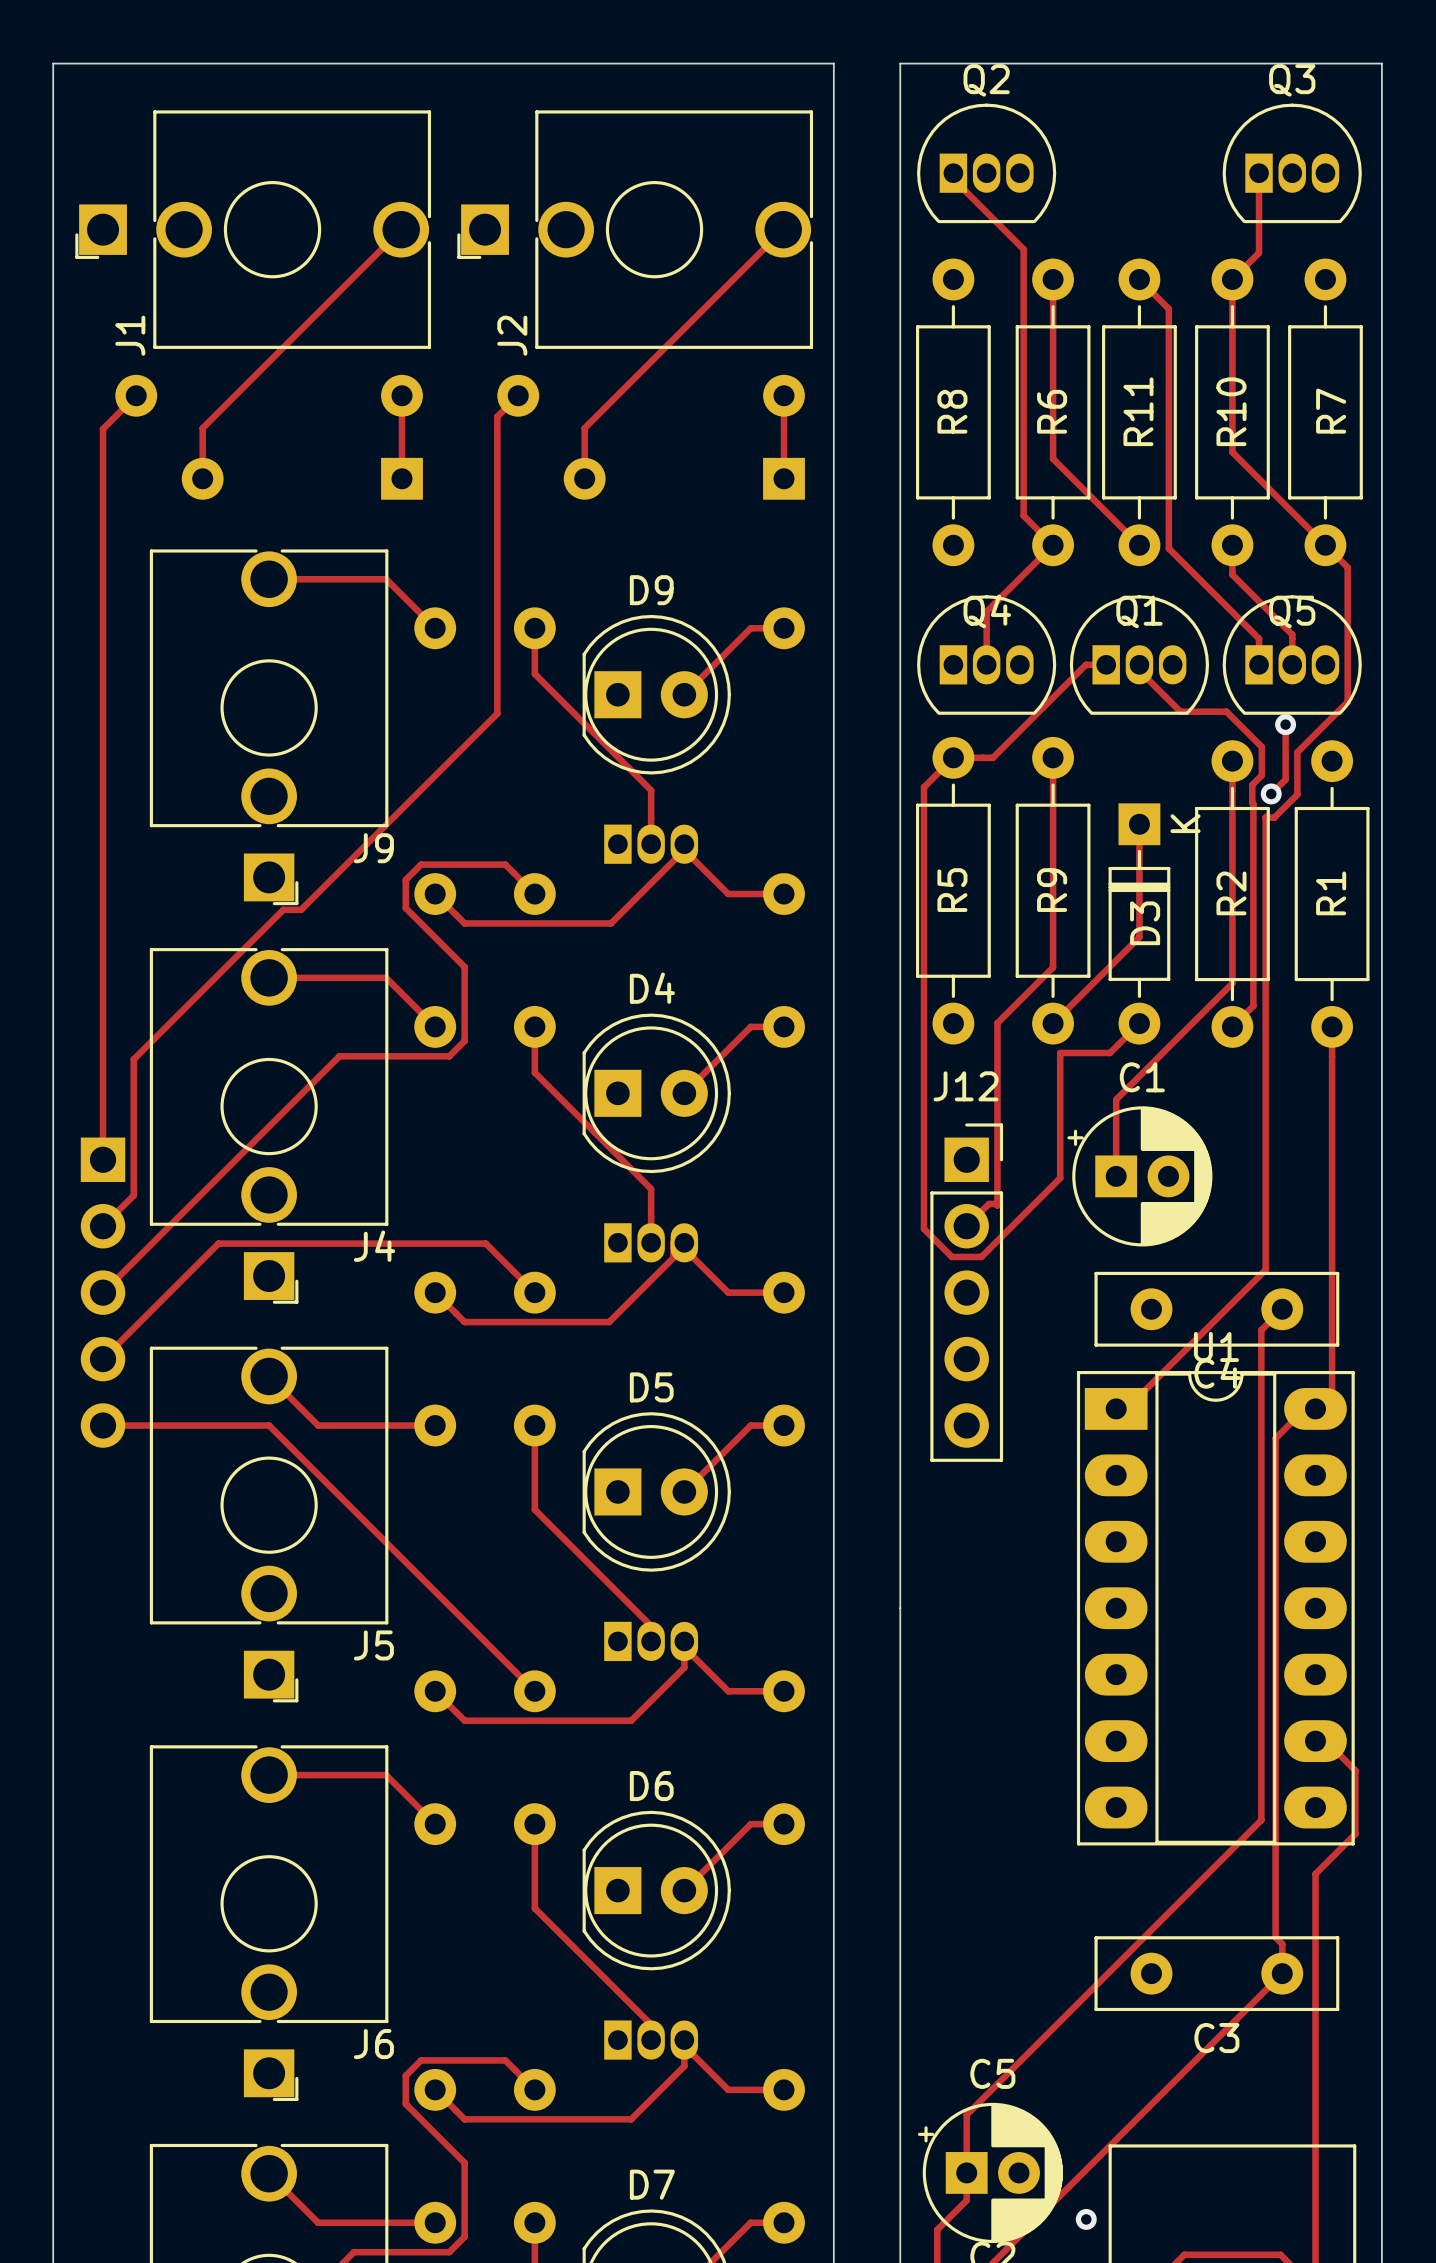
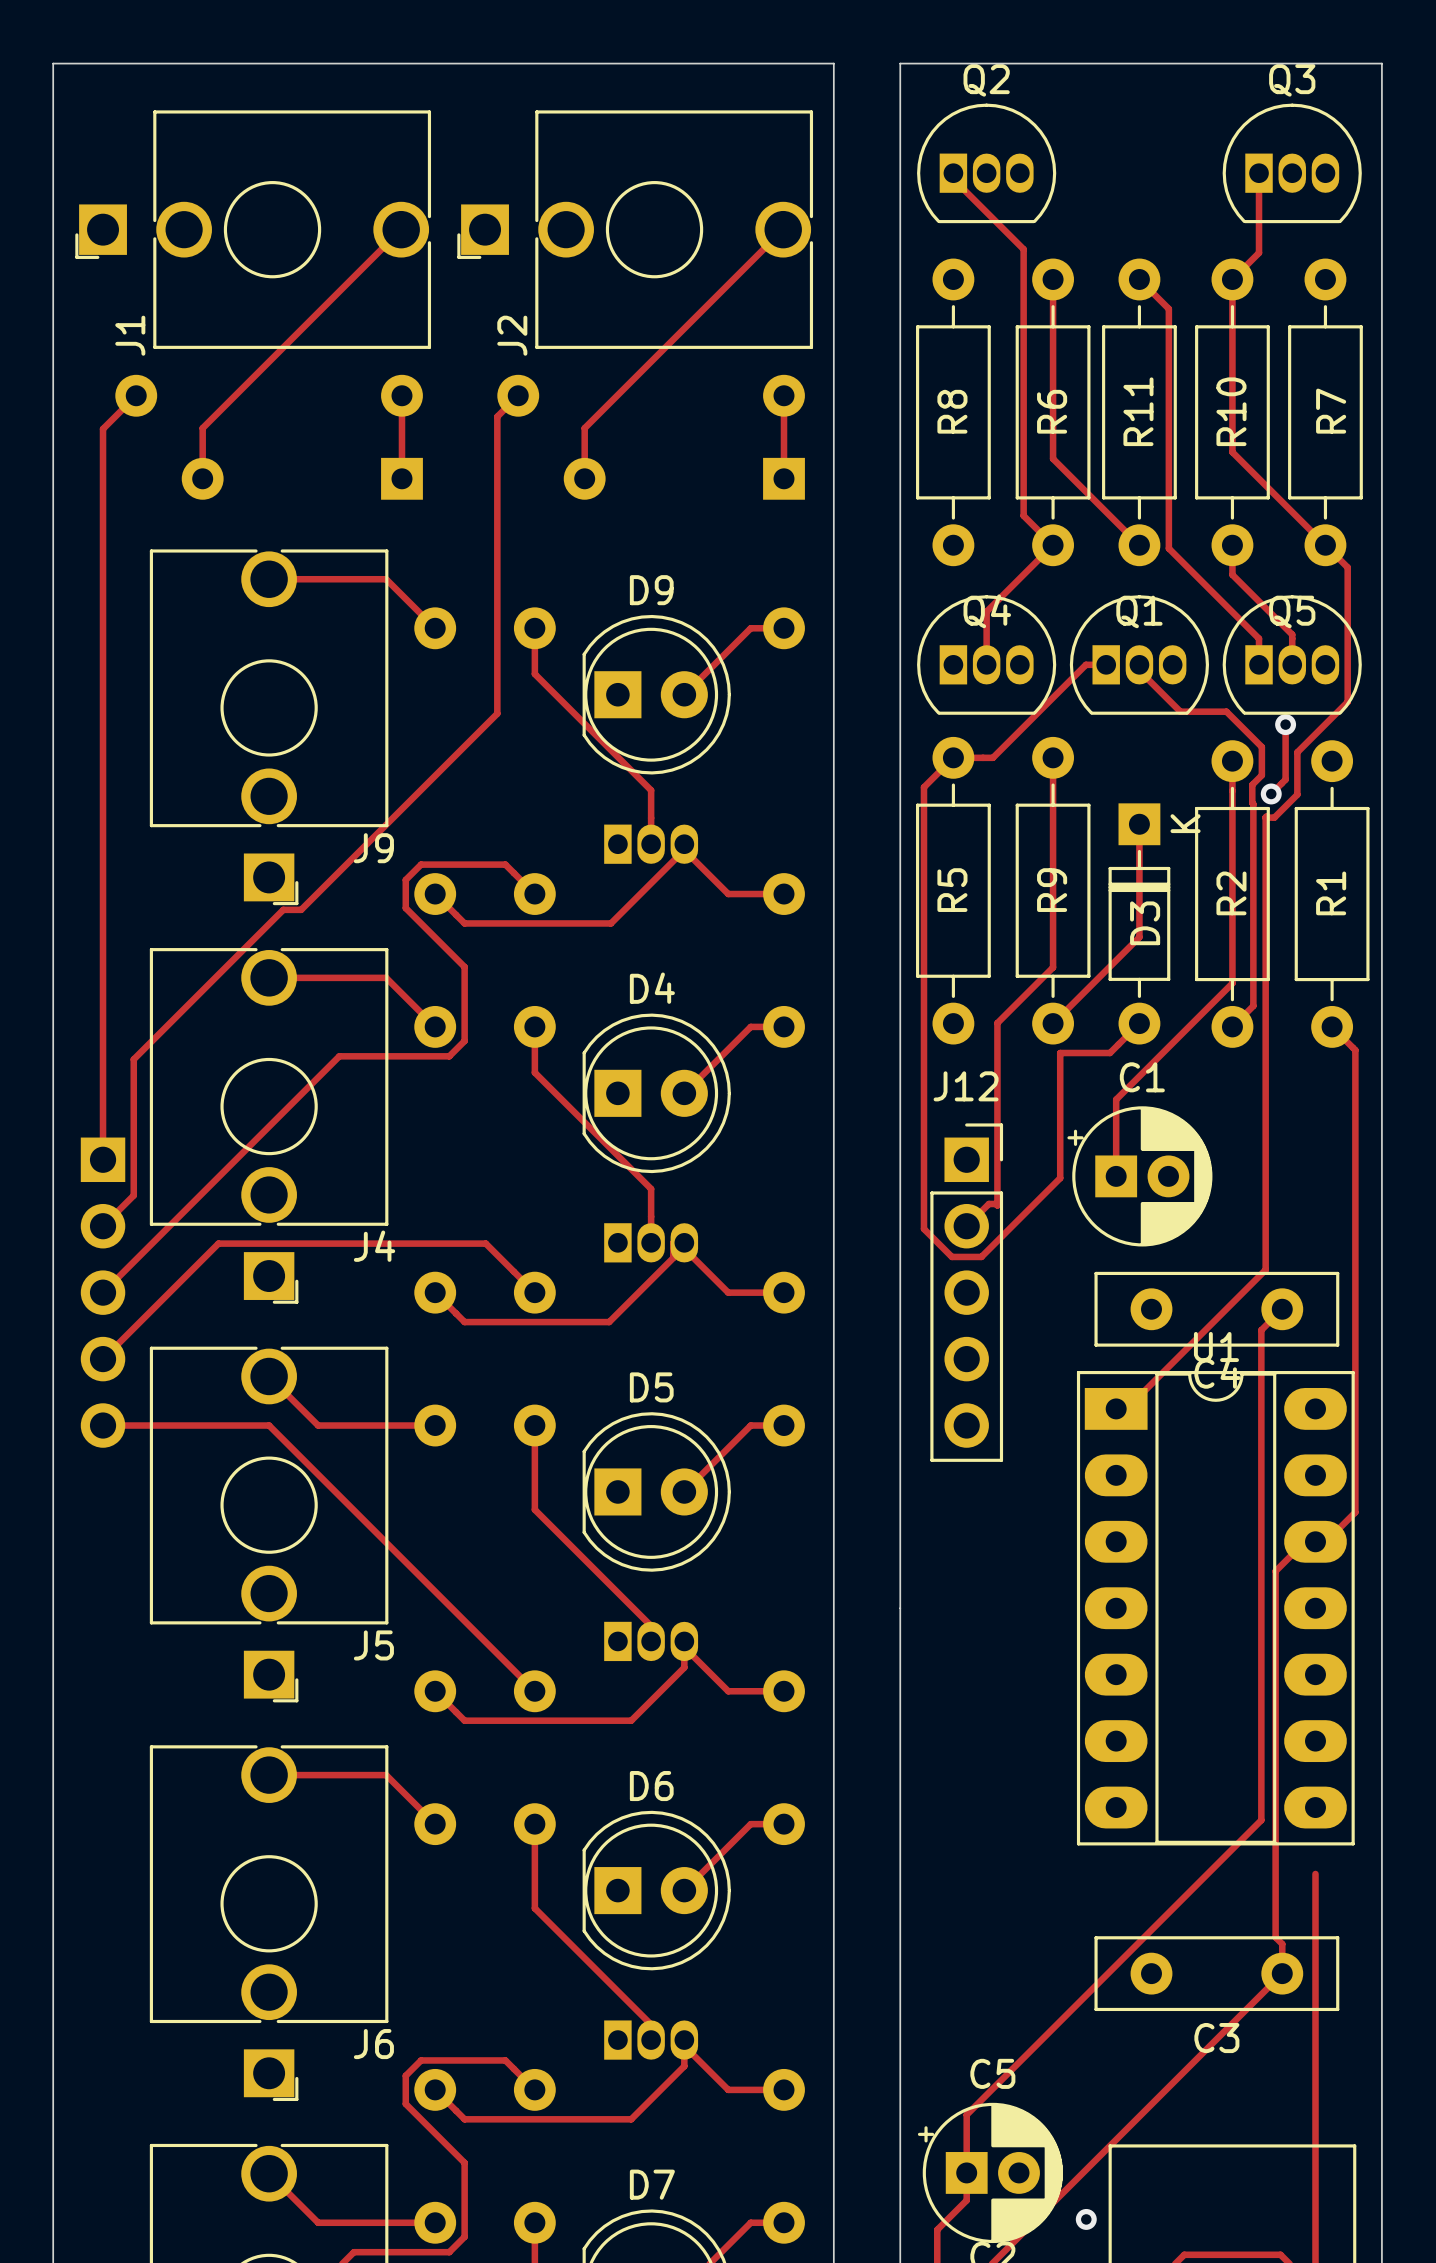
track: (1332, 1026) (1332, 1402) (1325, 1408) (1305, 1408) (1275, 1438) (1275, 1571) -> (1332, 1026) (1355, 1050) (1355, 1512) (1325, 1541)
track: none -> (1305, 1541) (1275, 1571)
track: (1315, 1741) (1325, 1741) (1355, 1770) (1355, 1834) (1315, 1873) -> none

